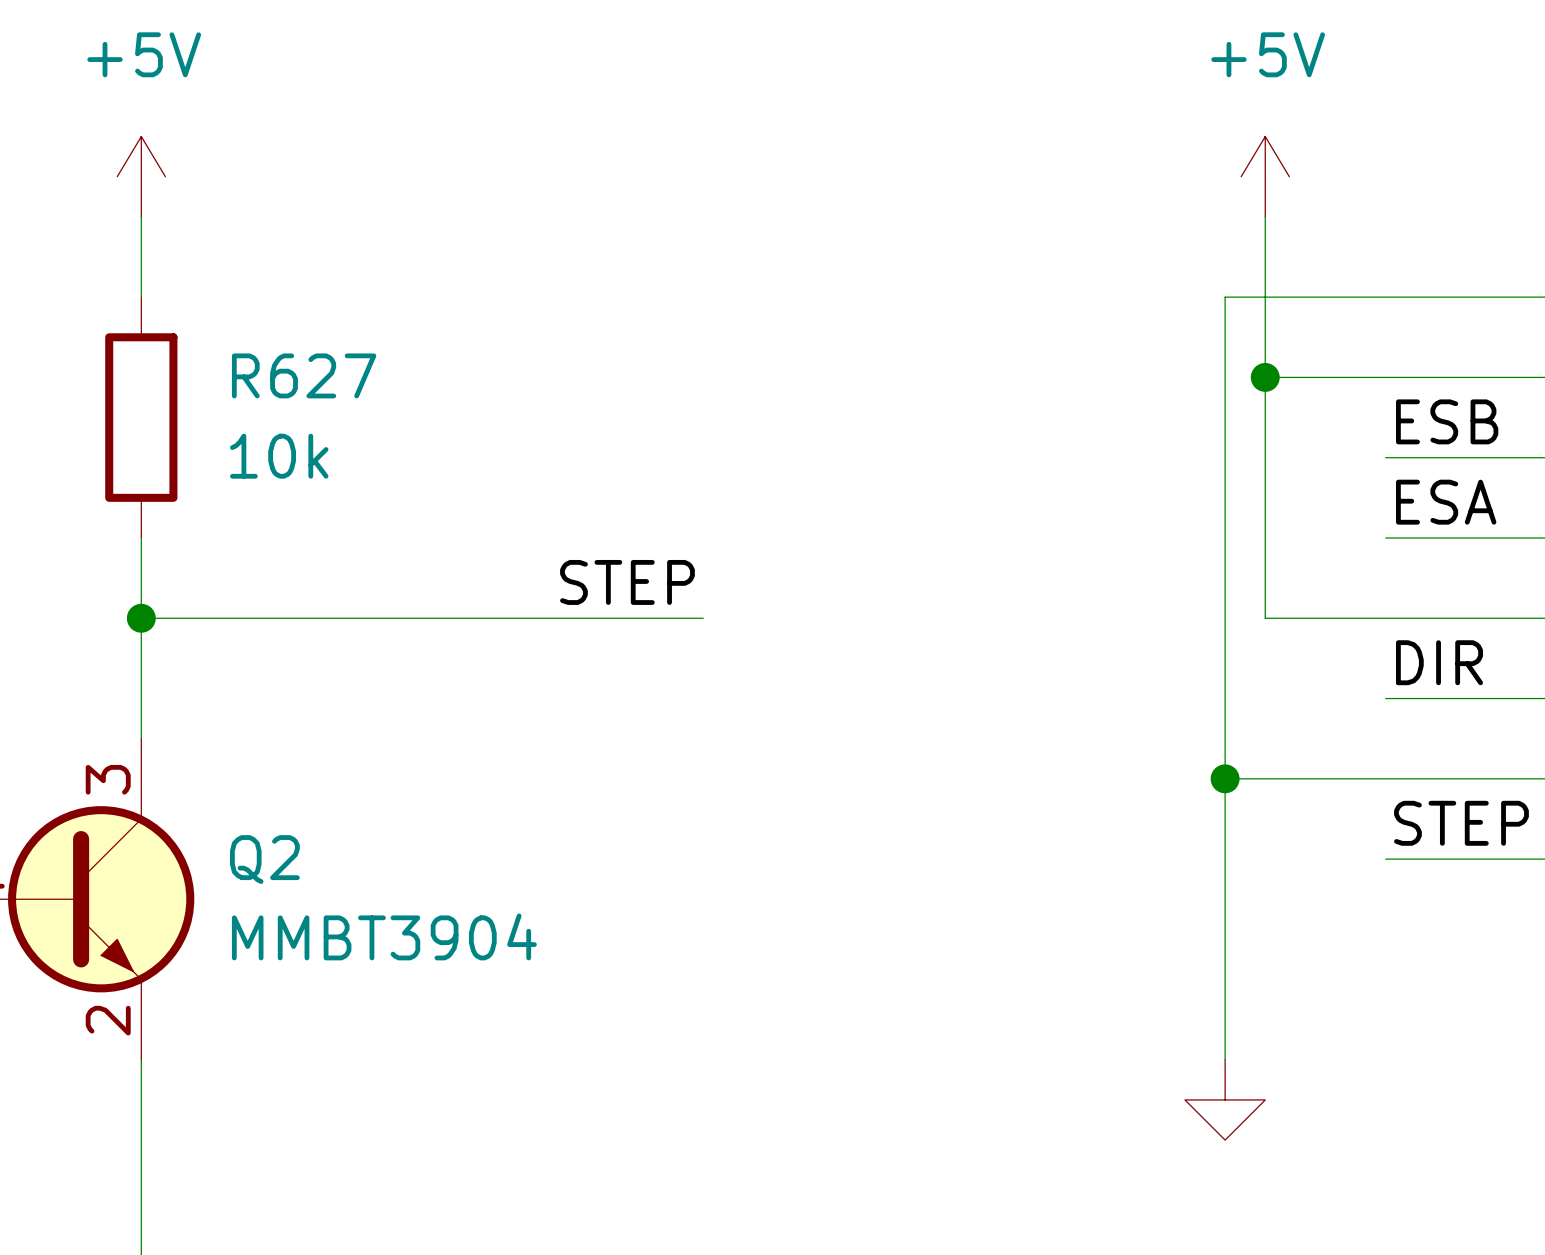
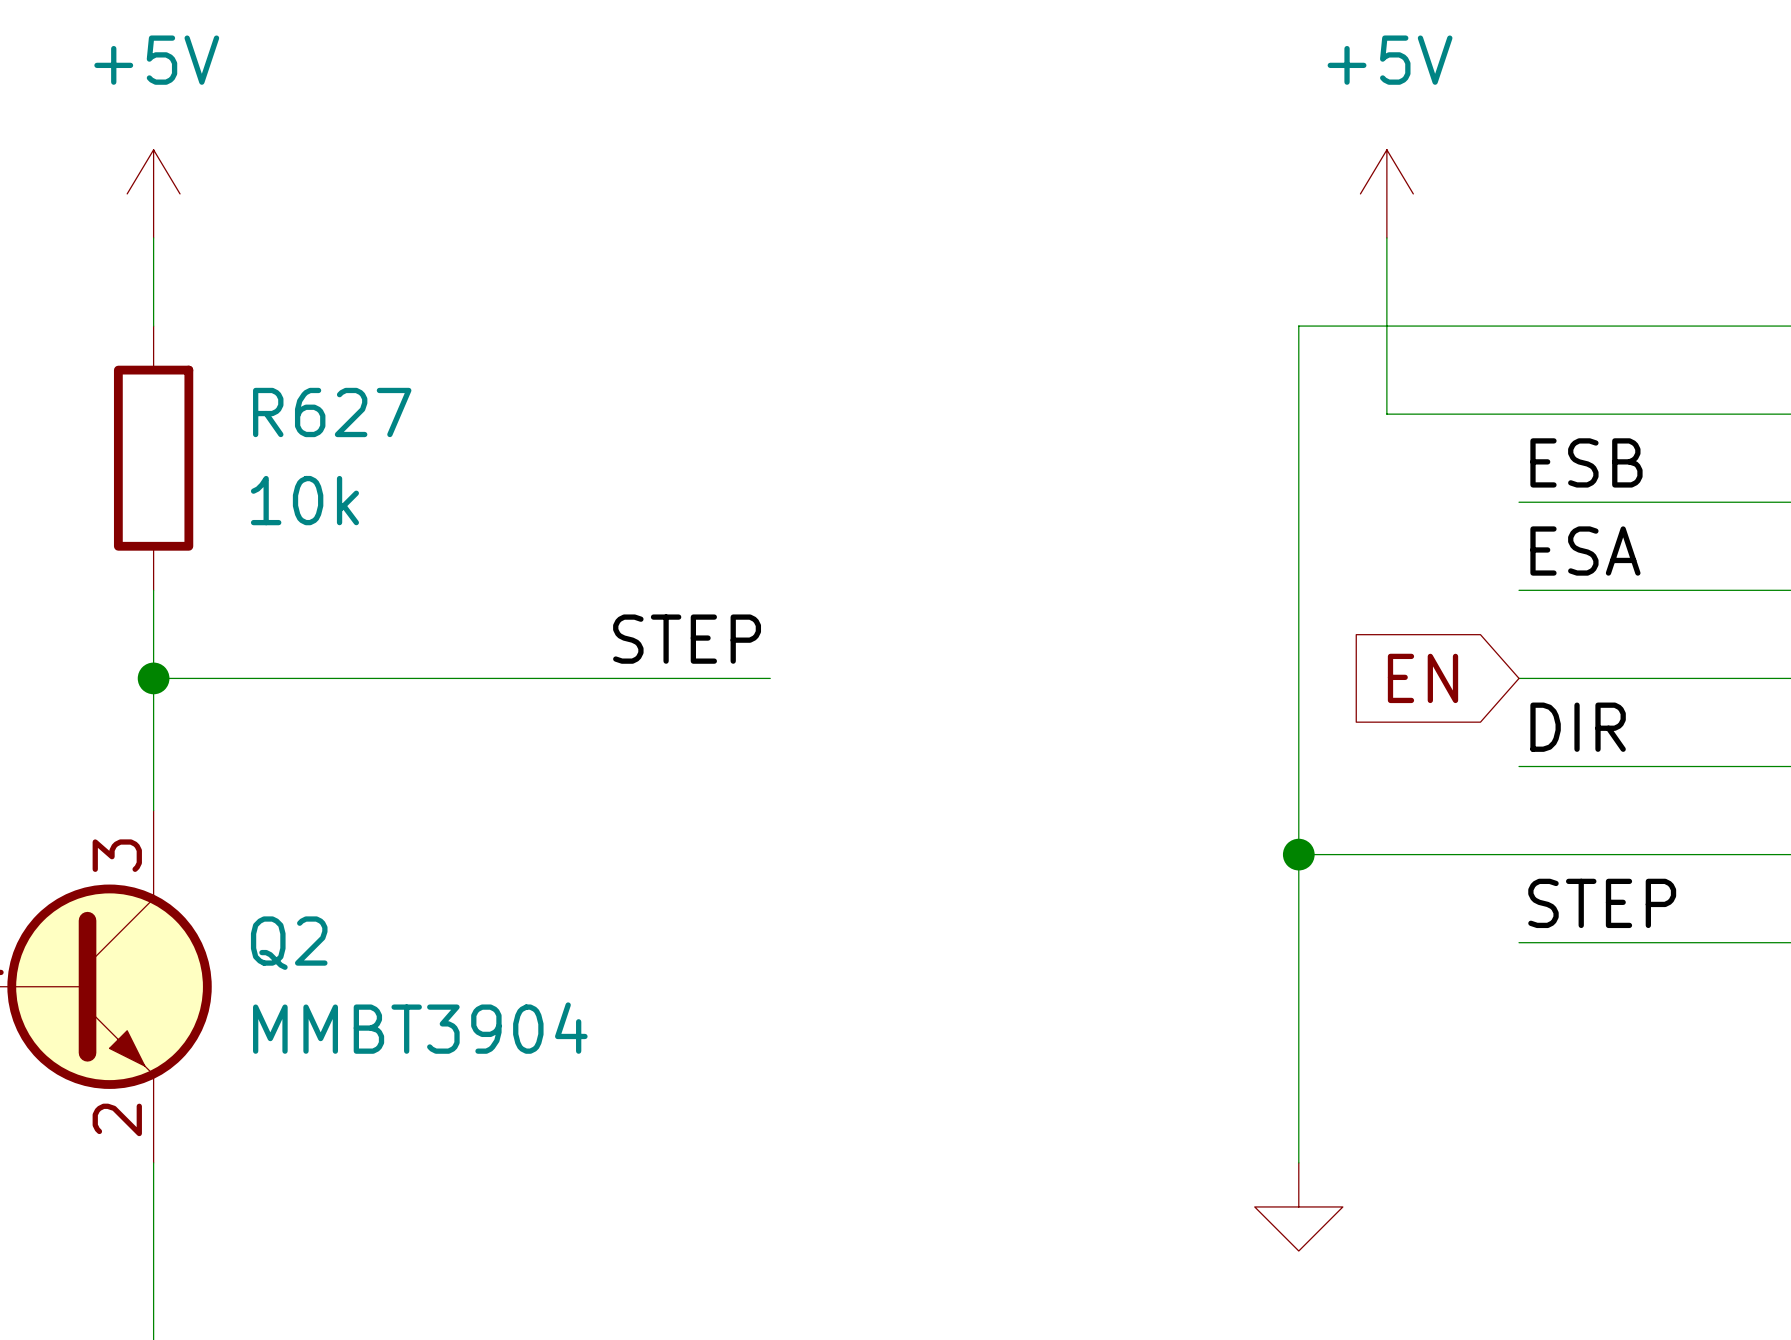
wire: (1225, 297) (1225, 1059) -> (1342, 326) (1298, 326) (1298, 1162)
wire: (1265, 377) (1265, 618) (1385, 618) -> none
junction: (1265, 377) -> none
global label: none -> EN (1423, 678)
wire: none -> (1298, 854) (1342, 854)
junction position: (1225, 778) -> (1298, 854)
power symbol position: (1225, 1099) -> (1298, 1206)

